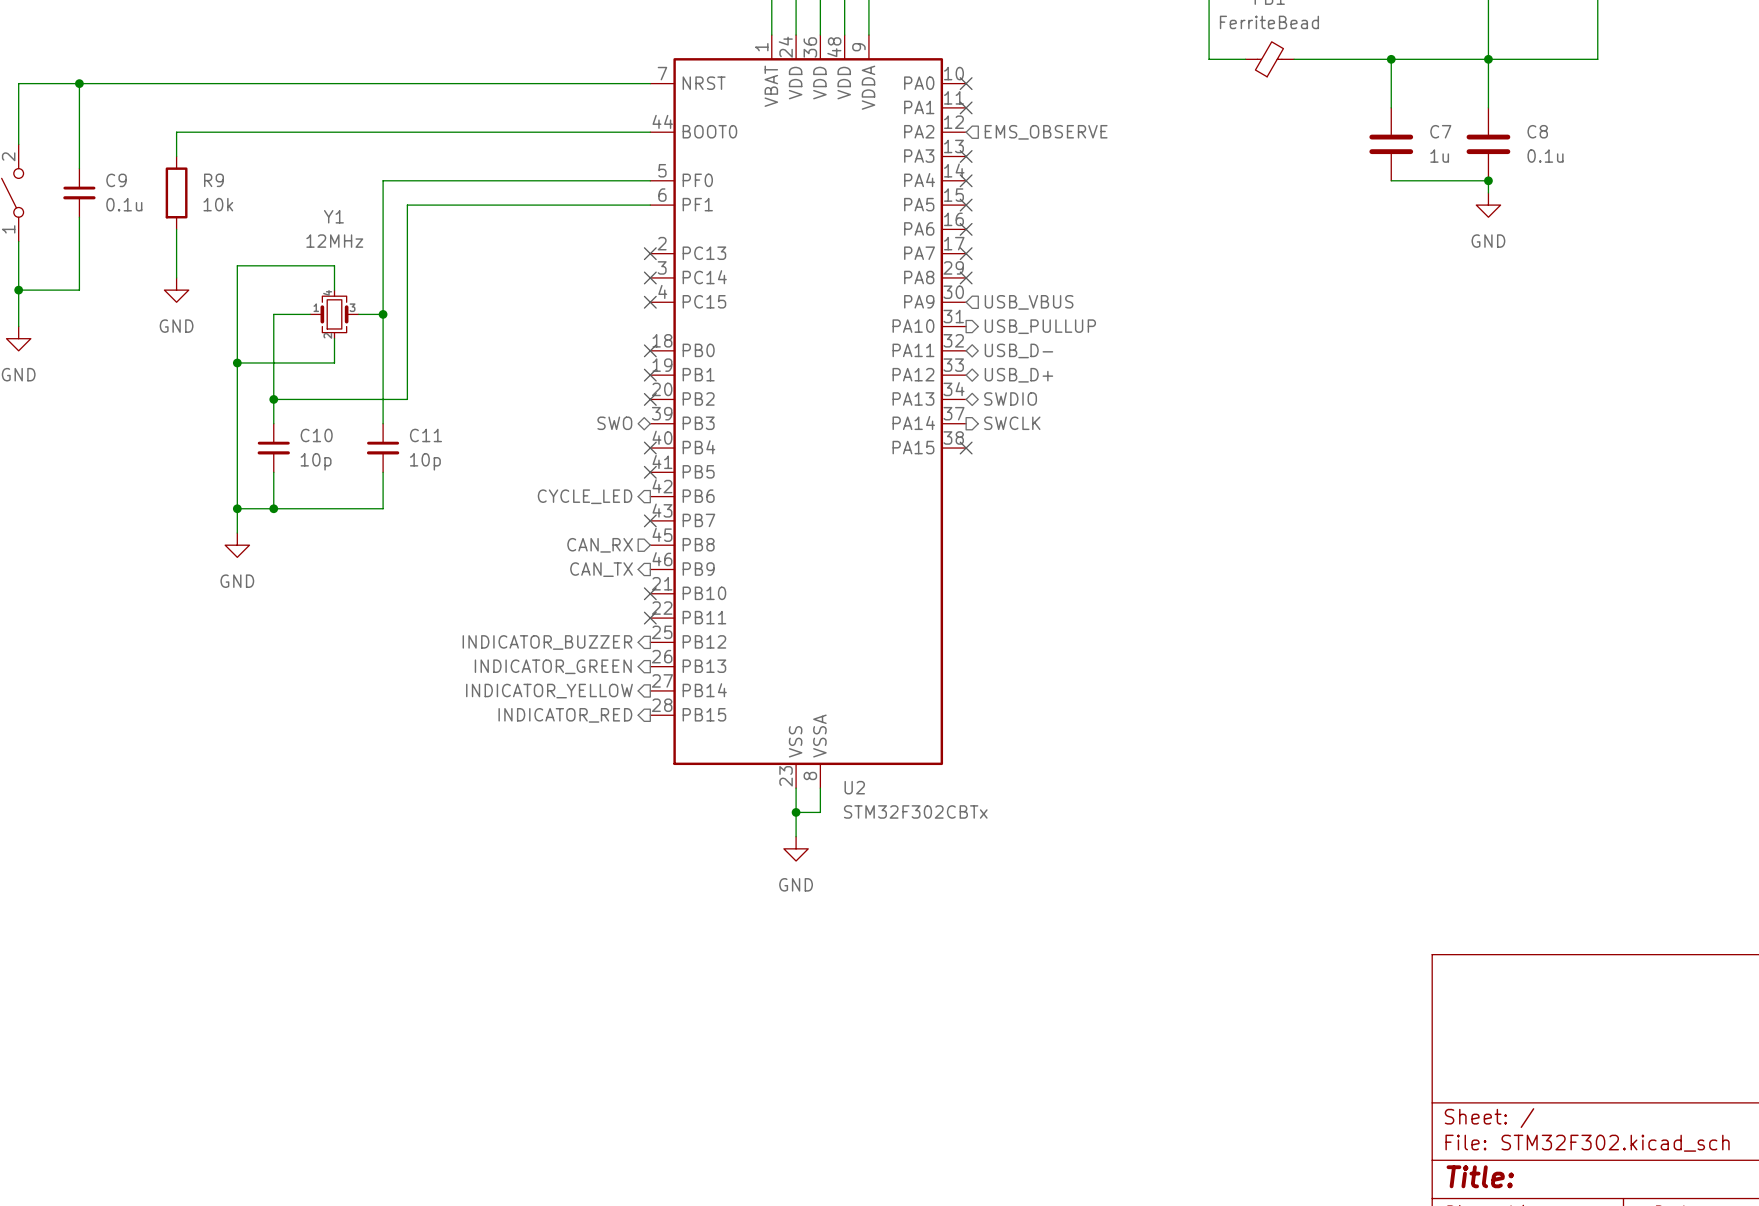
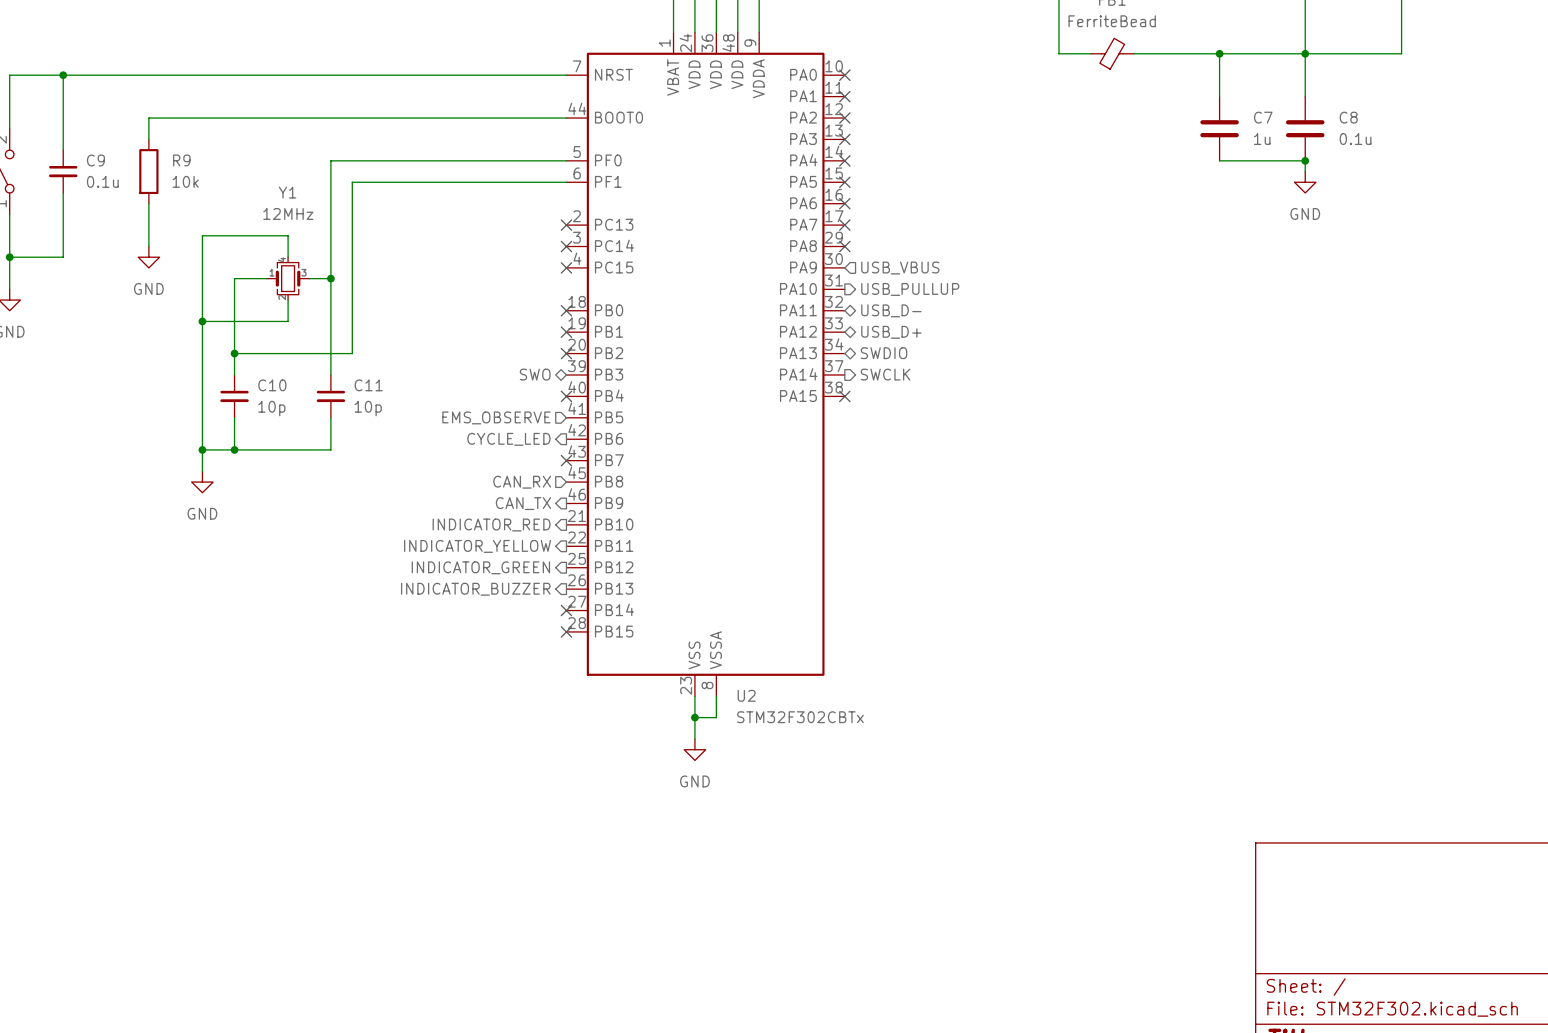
no-connect mark: none -> (844, 118)
hierarchical label: EMS_OBSERVE (1046, 132) -> none
hierarchical label: none -> EMS_OBSERVE (496, 417)
no-connect mark: (650, 472) -> none
no-connect mark: (650, 593) -> none
no-connect mark: (650, 618) -> none
hierarchical label: INDICATOR_BUZZER (547, 642) -> INDICATOR_GREEN (480, 567)
hierarchical label: INDICATOR_GREEN (553, 666) -> INDICATOR_BUZZER (475, 589)
no-connect mark: none -> (566, 610)
hierarchical label position: INDICATOR_YELLOW (549, 691) -> INDICATOR_YELLOW (477, 546)
hierarchical label position: INDICATOR_RED (565, 715) -> INDICATOR_RED (491, 524)
no-connect mark: none -> (566, 631)

